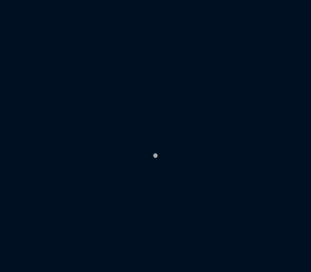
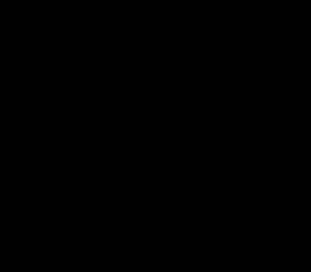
part: (155, 155) -> none

